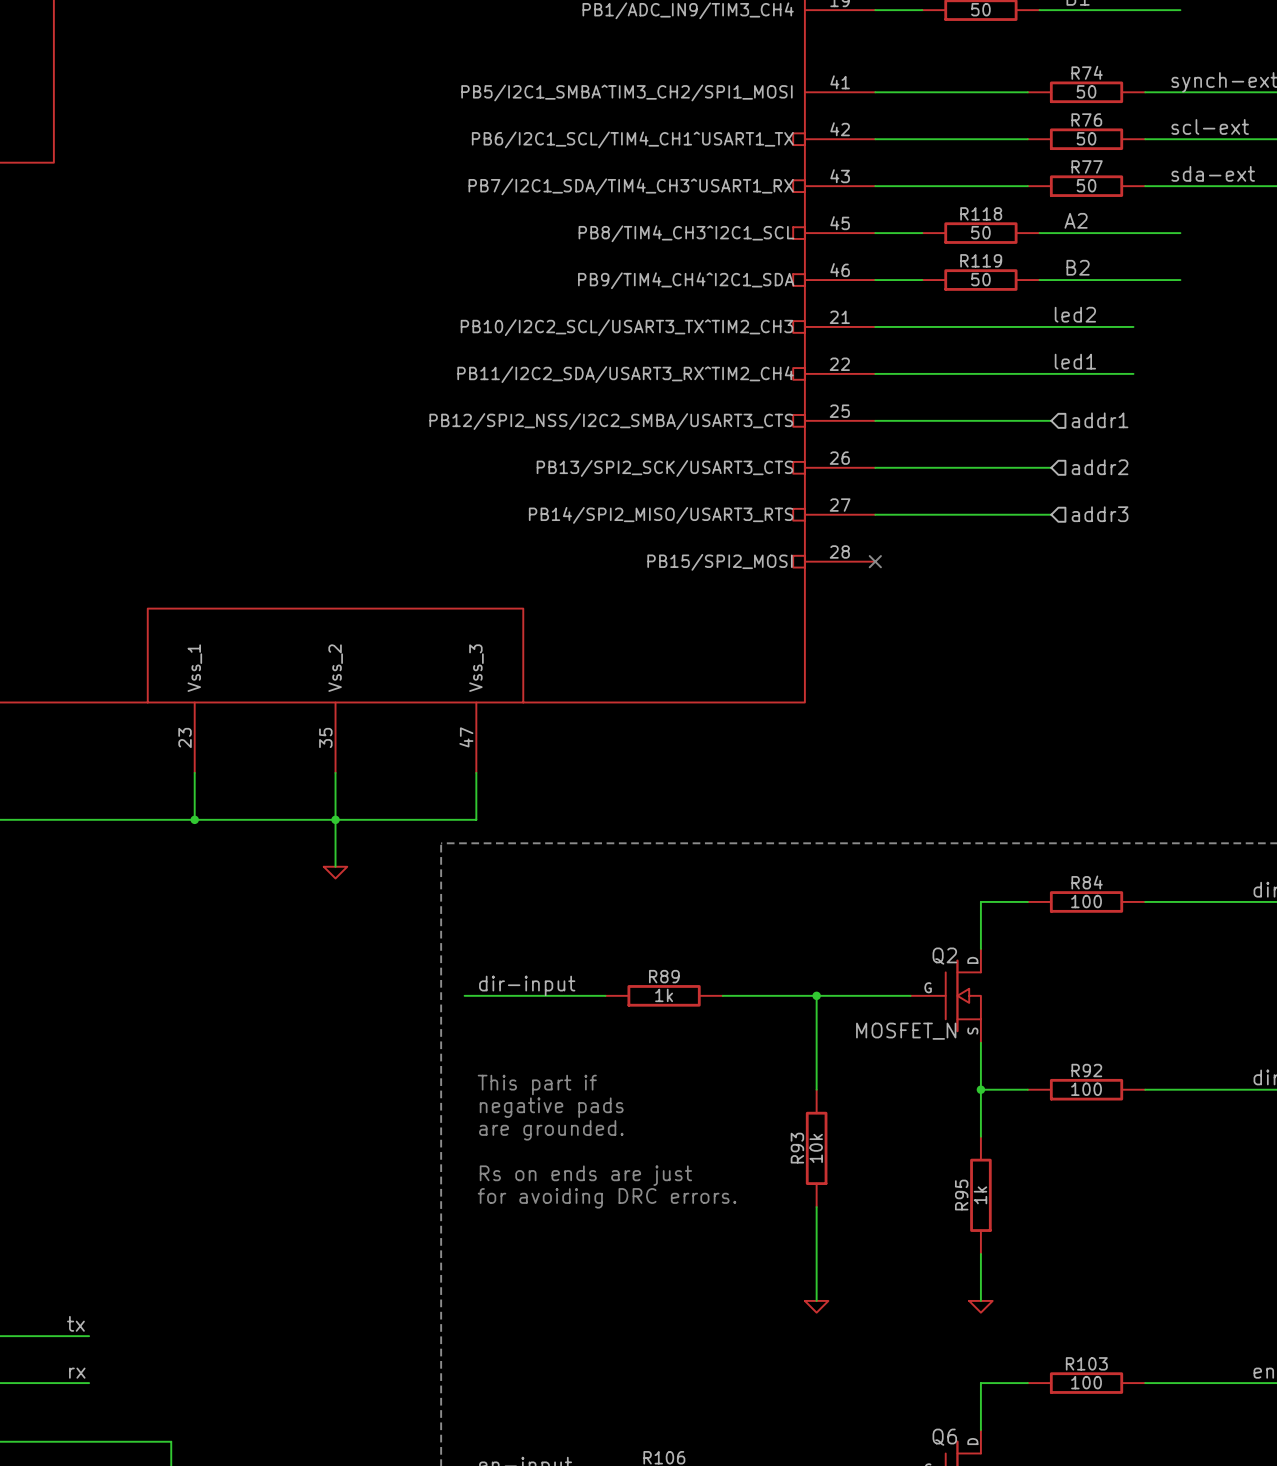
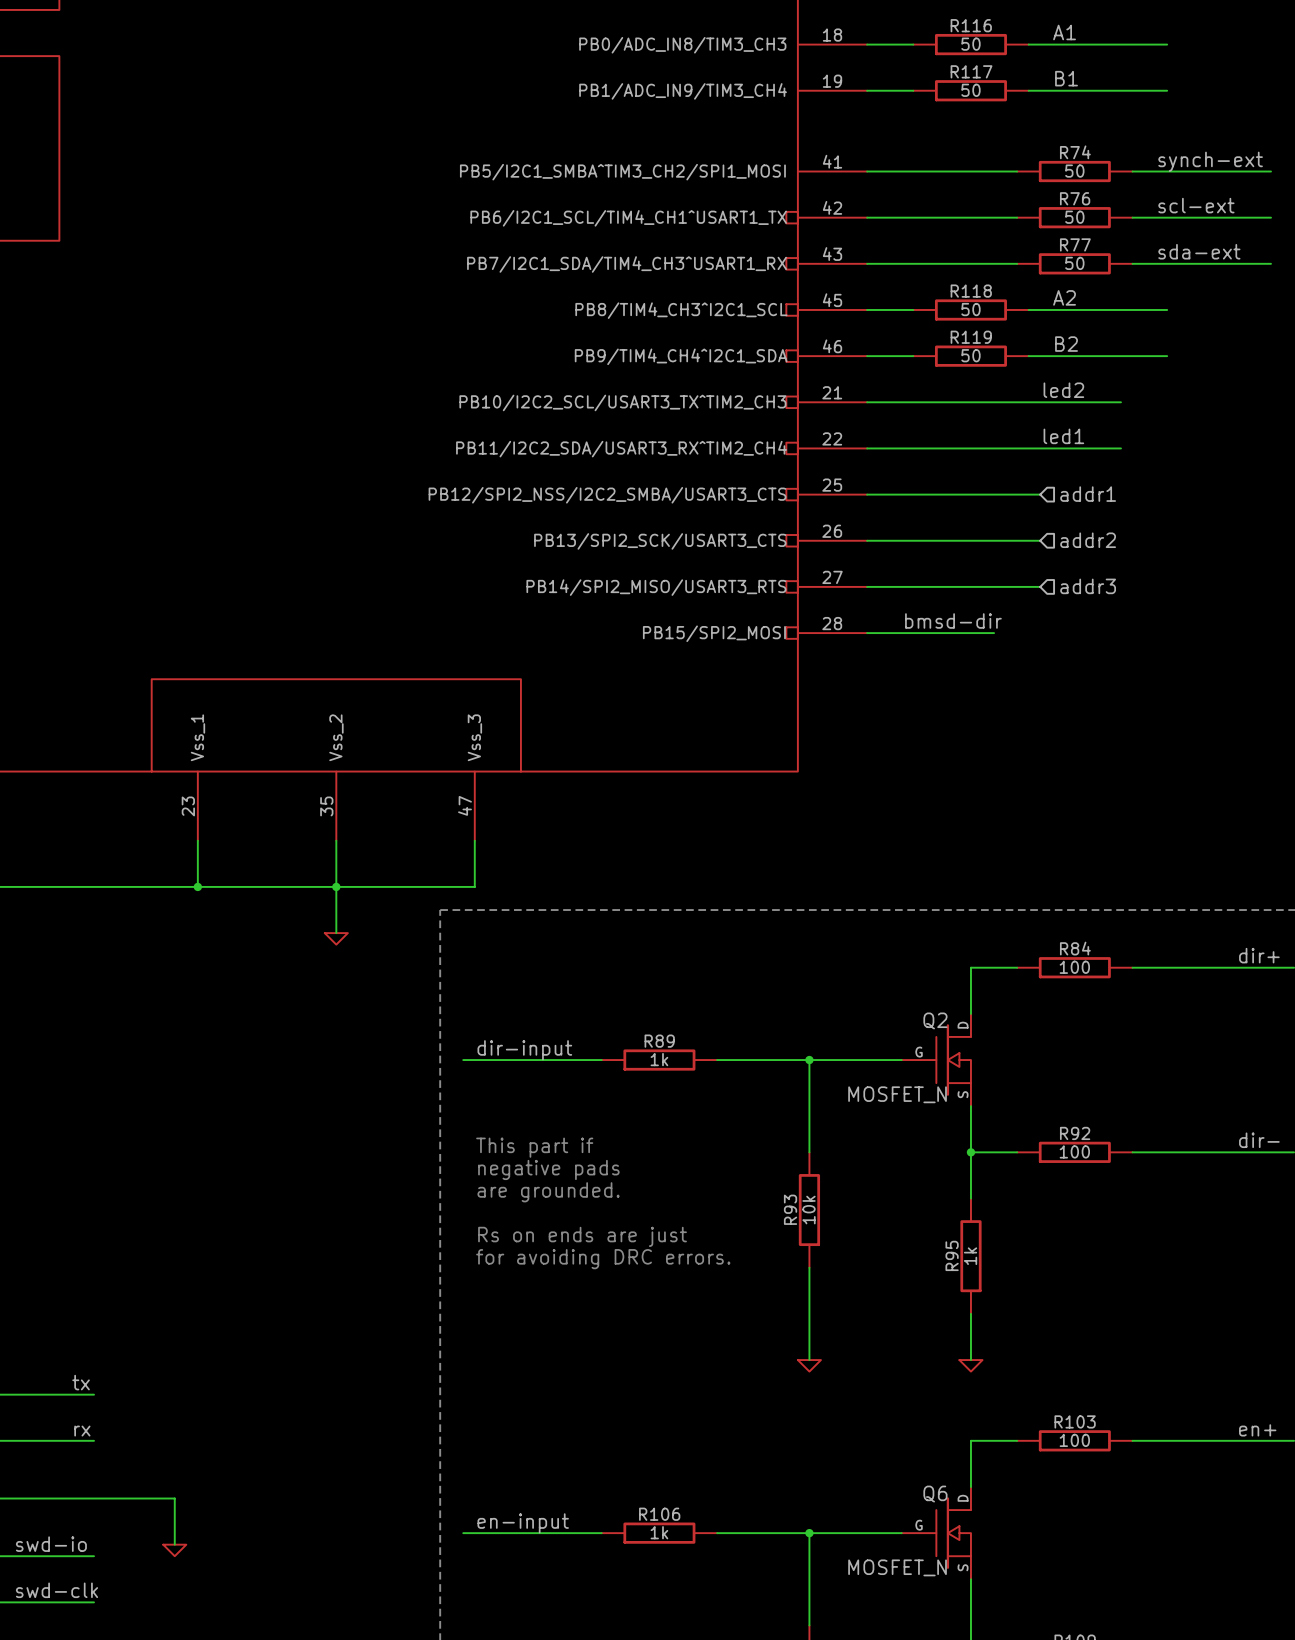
label: none -> bmsd-dir (953, 621)
wire: none -> (867, 633) (994, 633)
no-connect mark: (875, 561) -> none

